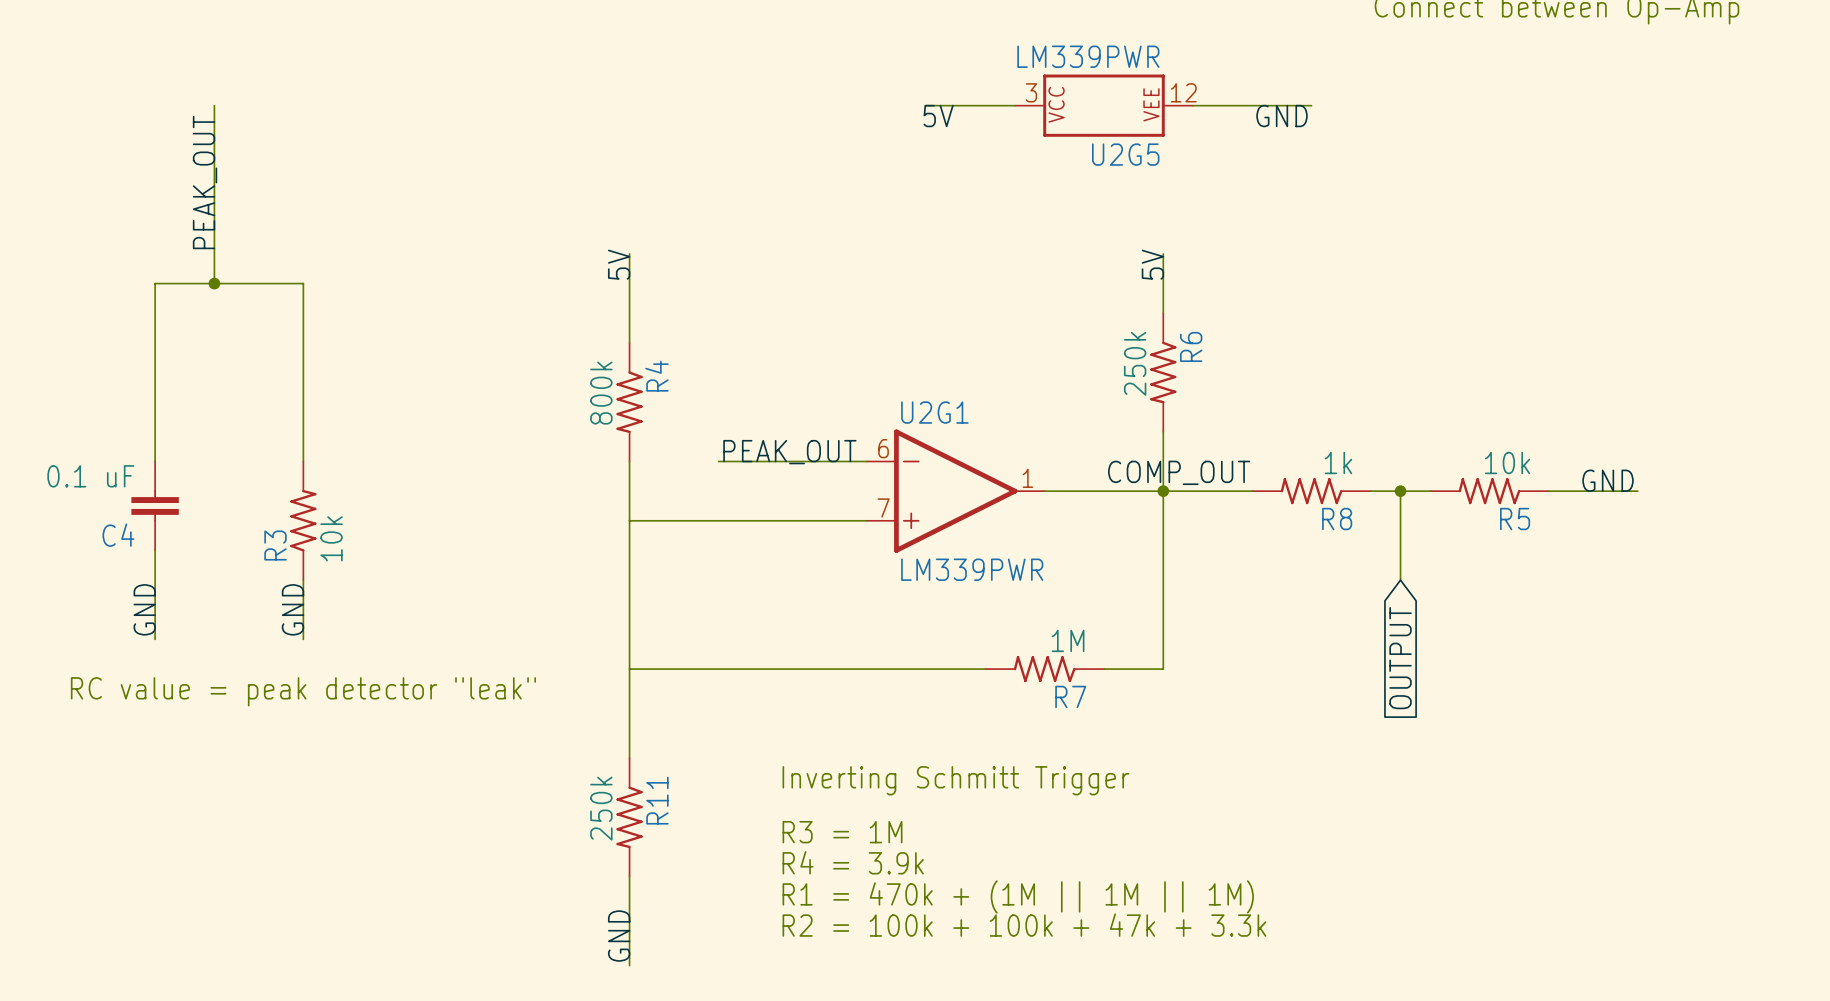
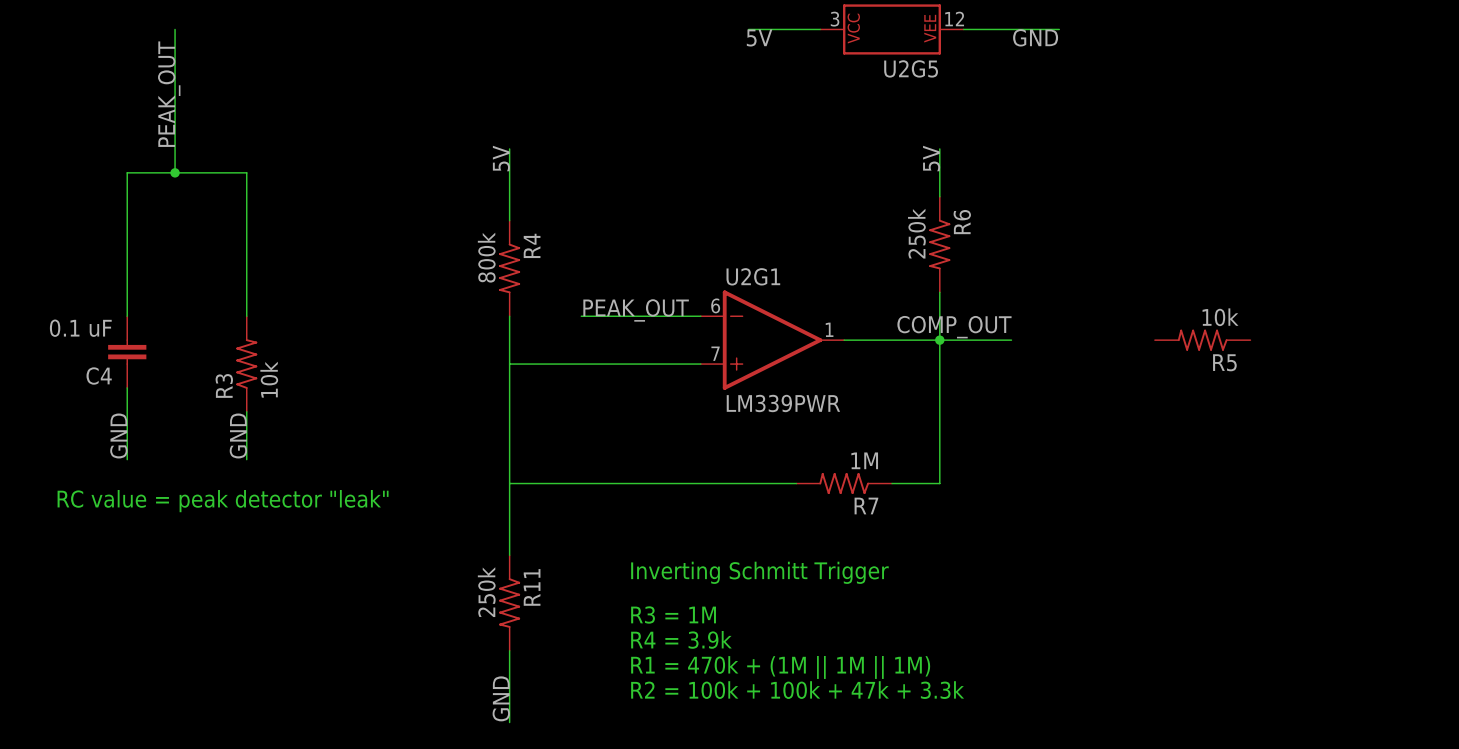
label: GND (1608, 480) -> none
R8: 1k (1311, 491) -> none
wire: (1370, 491) (1430, 491) -> none
wire: (1400, 491) (1400, 580) -> none
junction: (1400, 491) -> none
wire: (1548, 491) (1637, 491) -> none
global label: OUTPUT (1400, 658) -> none

